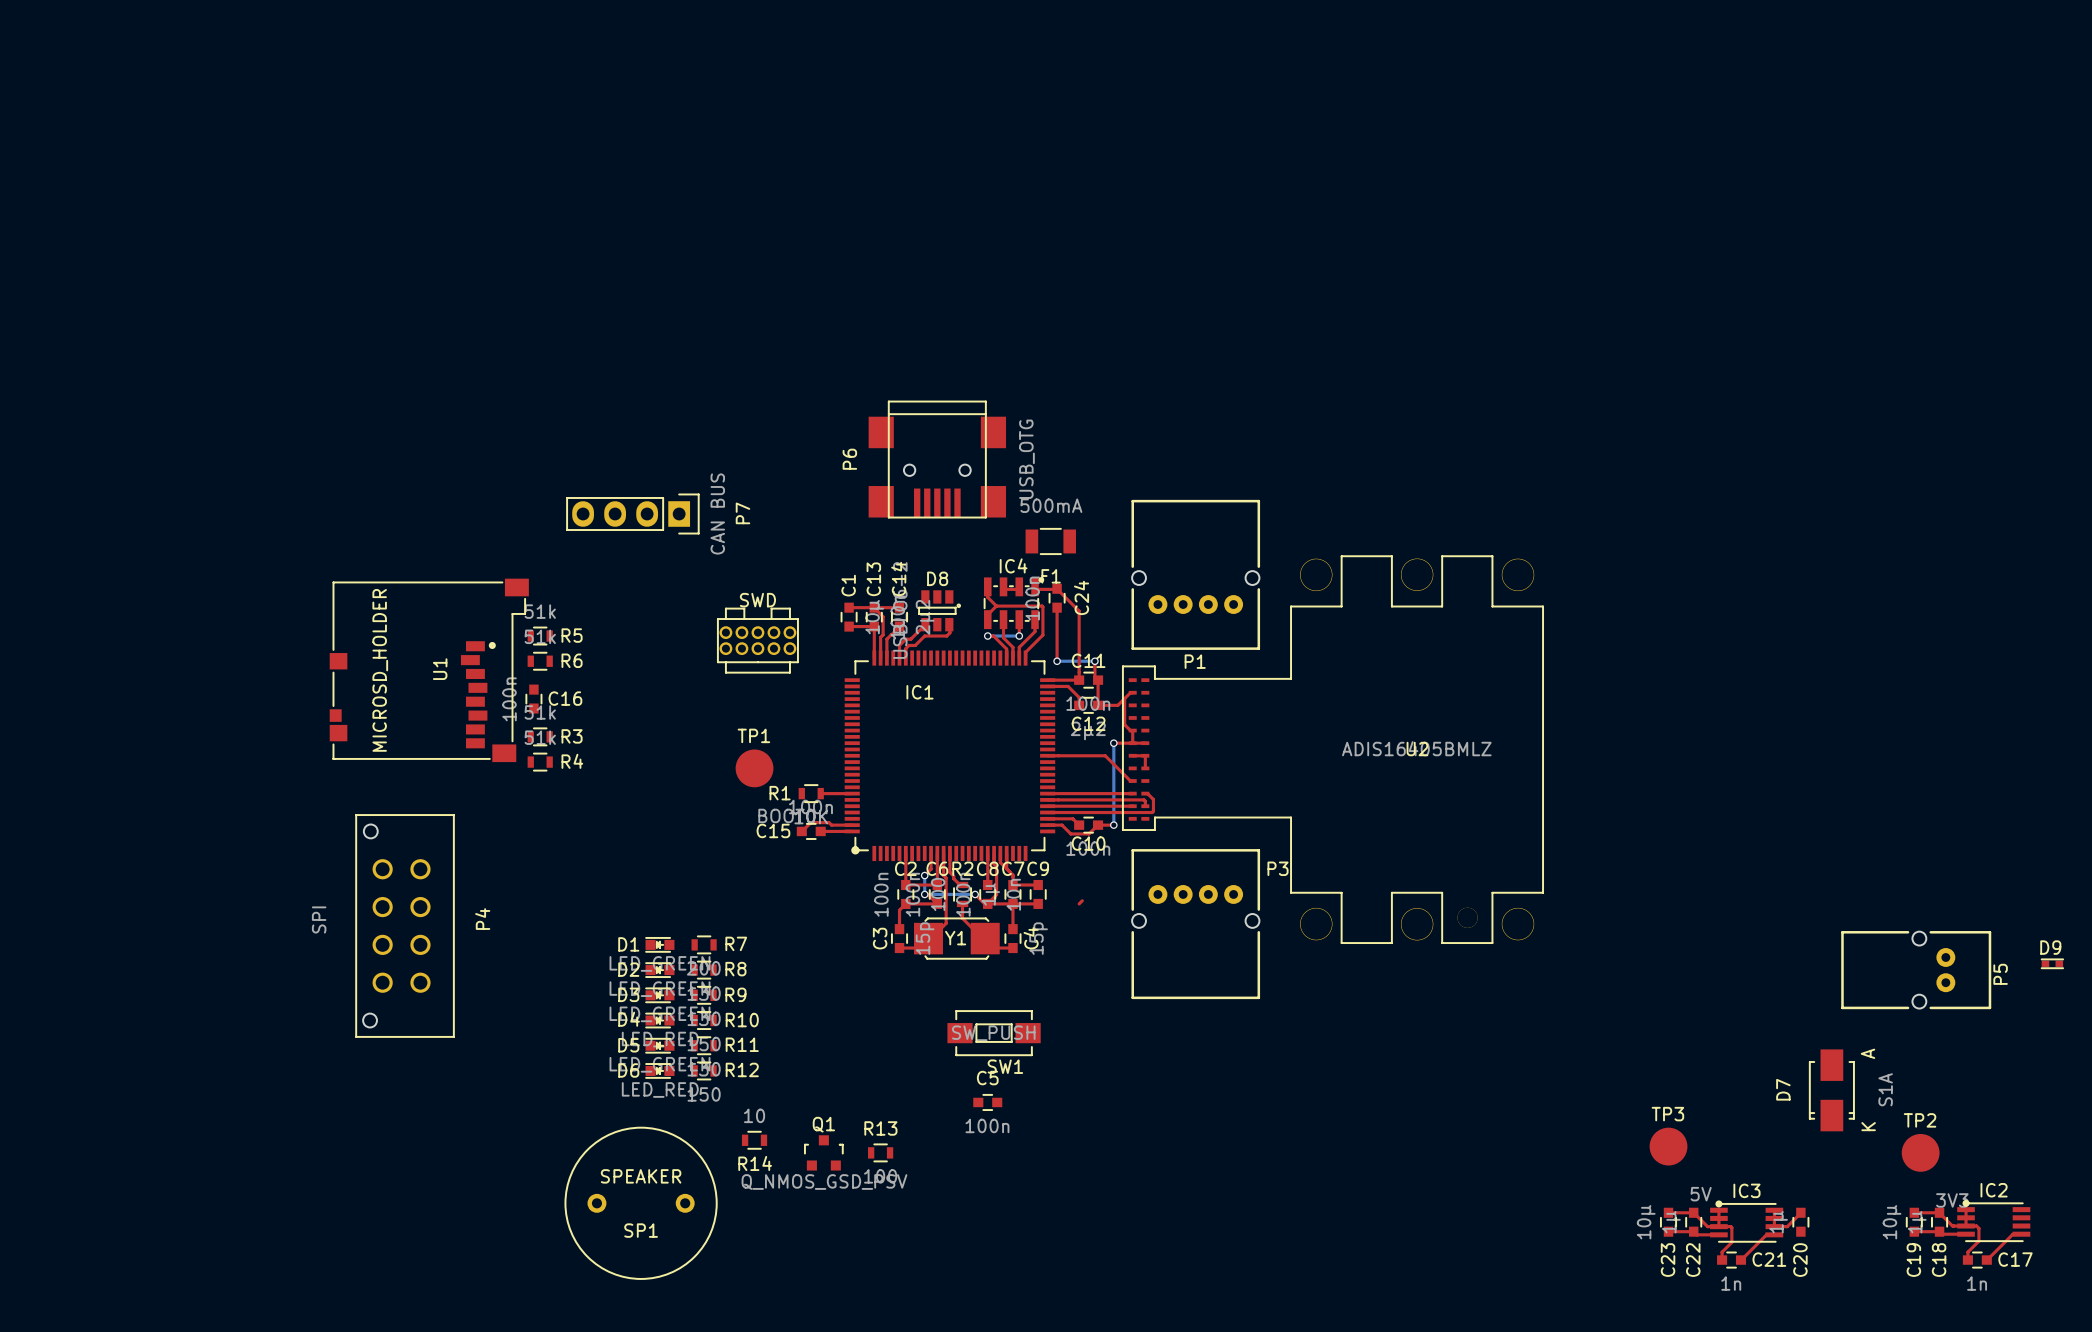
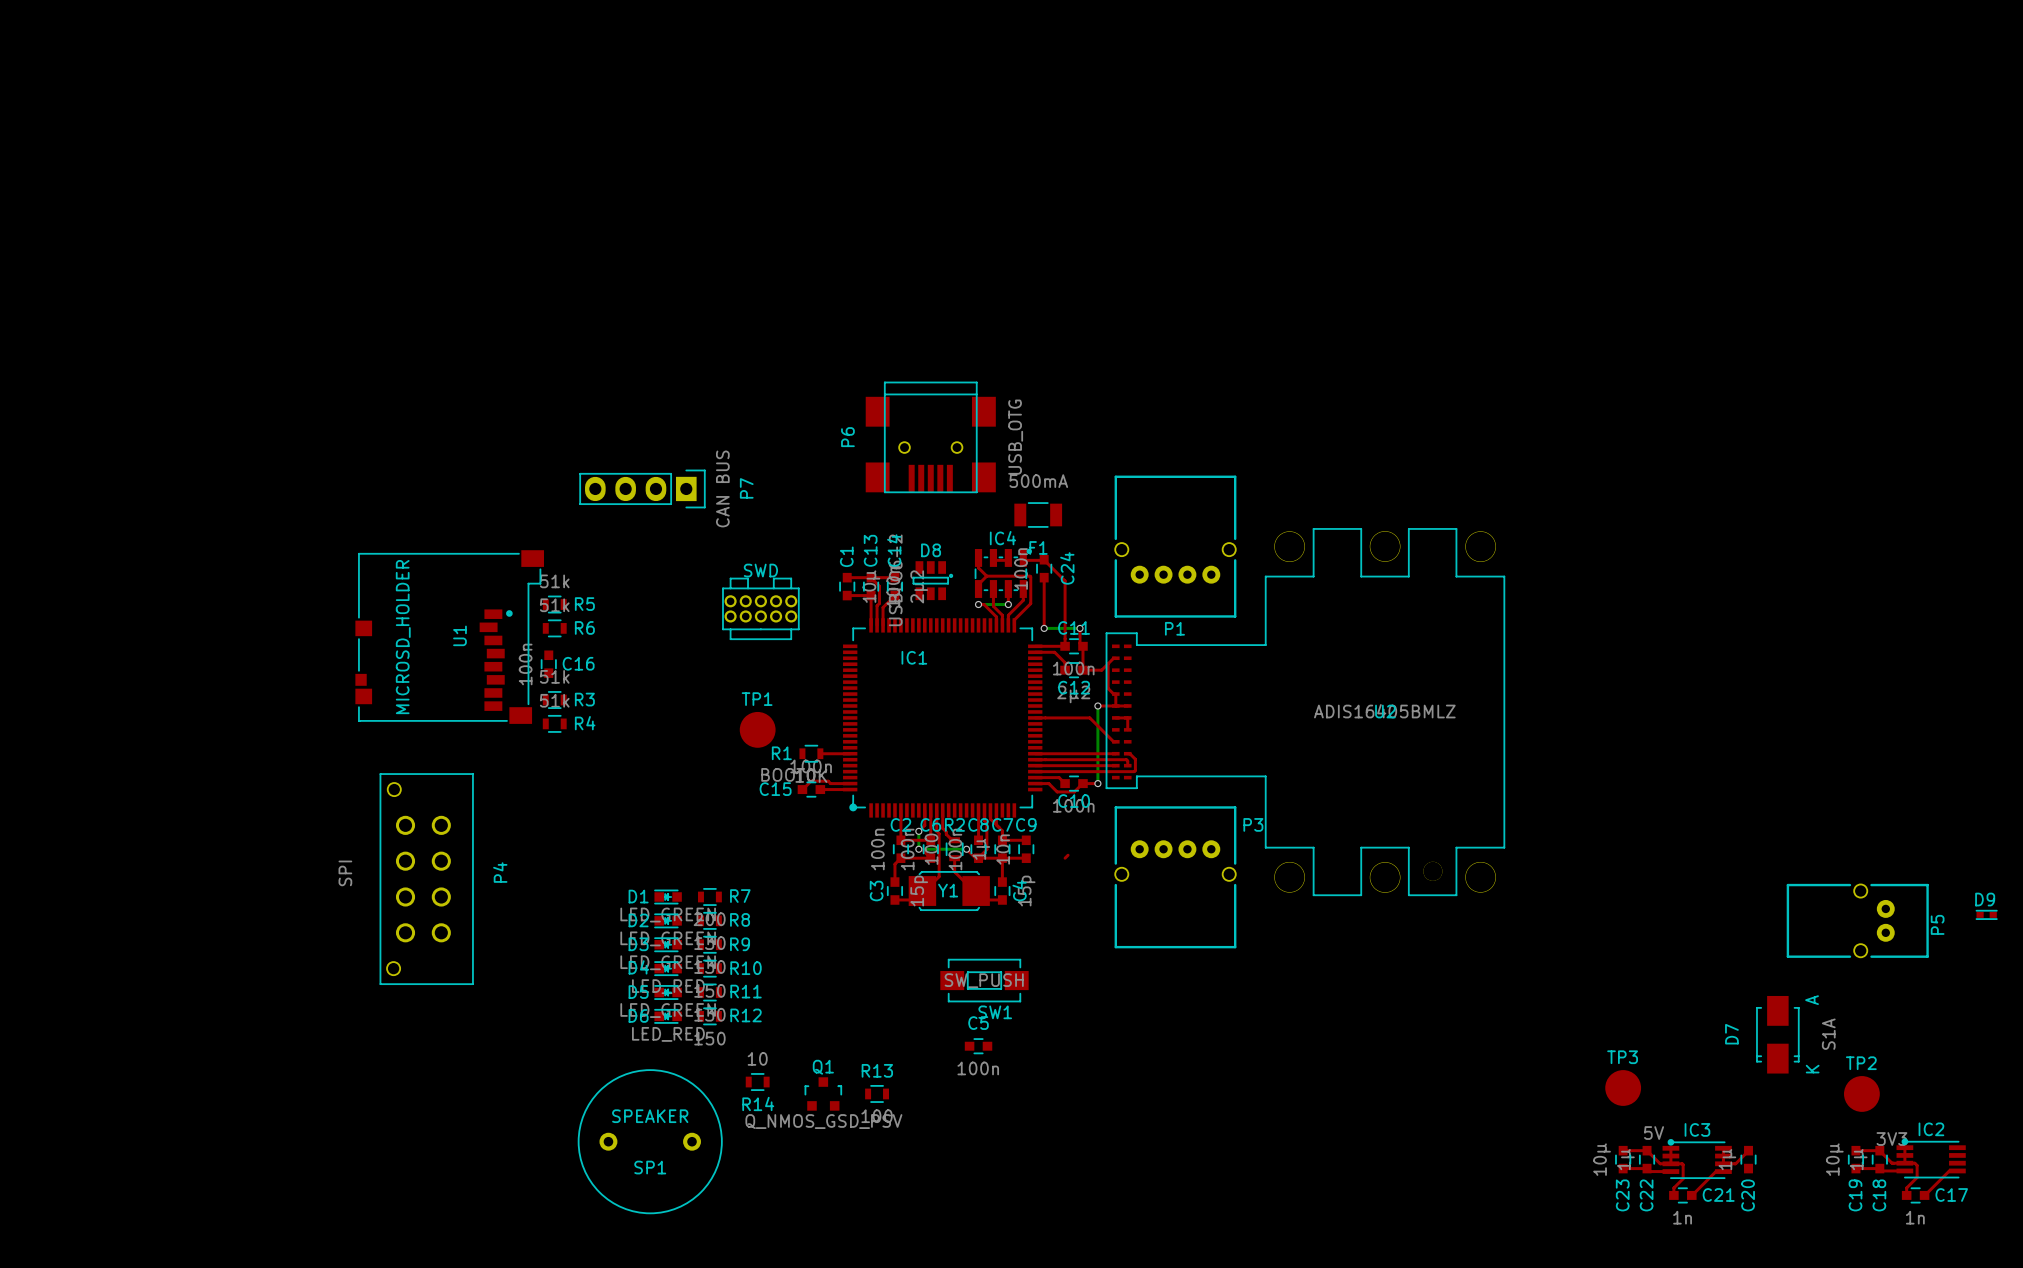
top track: (925, 624) (910, 639) (905, 639) (899, 645) (899, 658) -> none
top track: (949, 624) (949, 632) (946, 636) (924, 636) (915, 645) (908, 645) (905, 648) (905, 658) -> none

